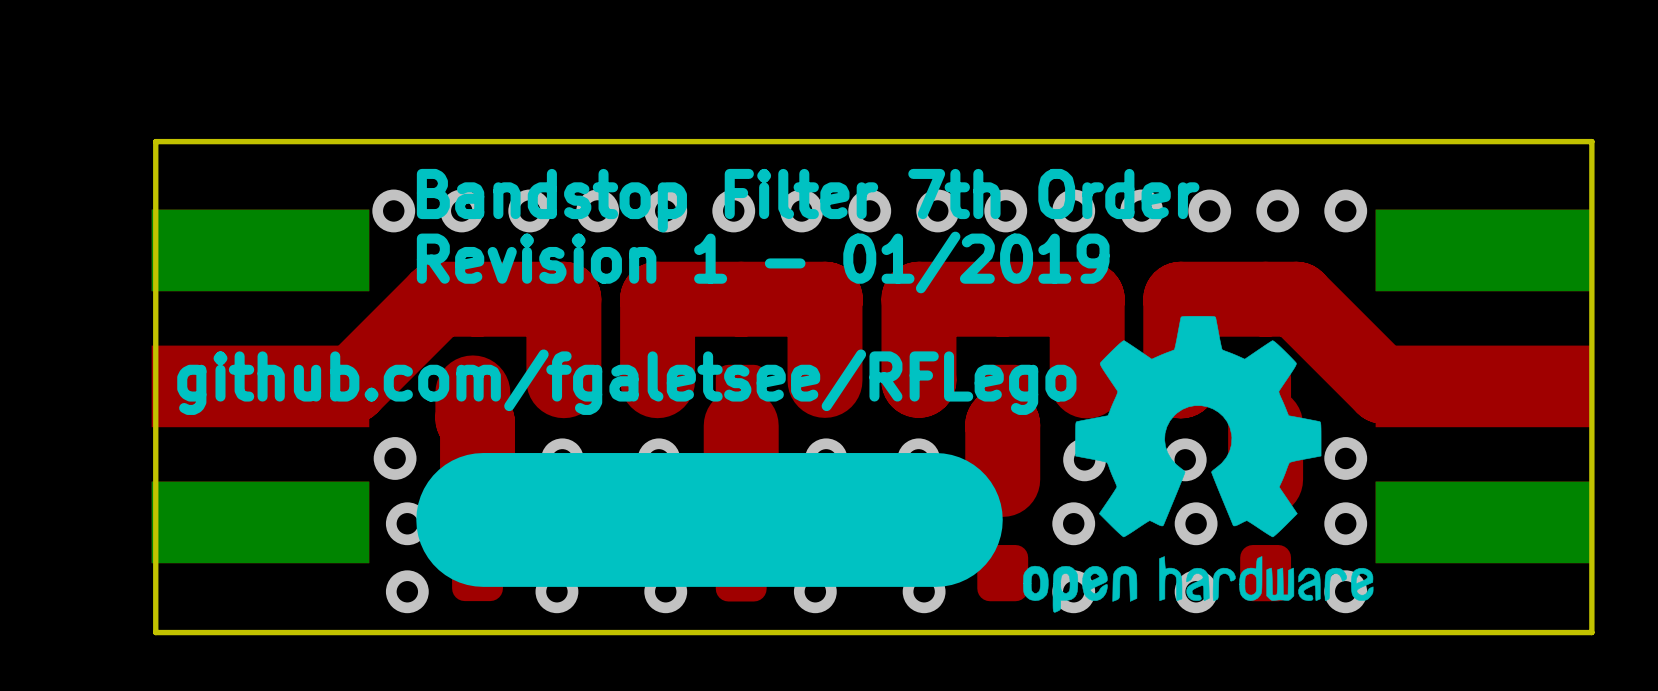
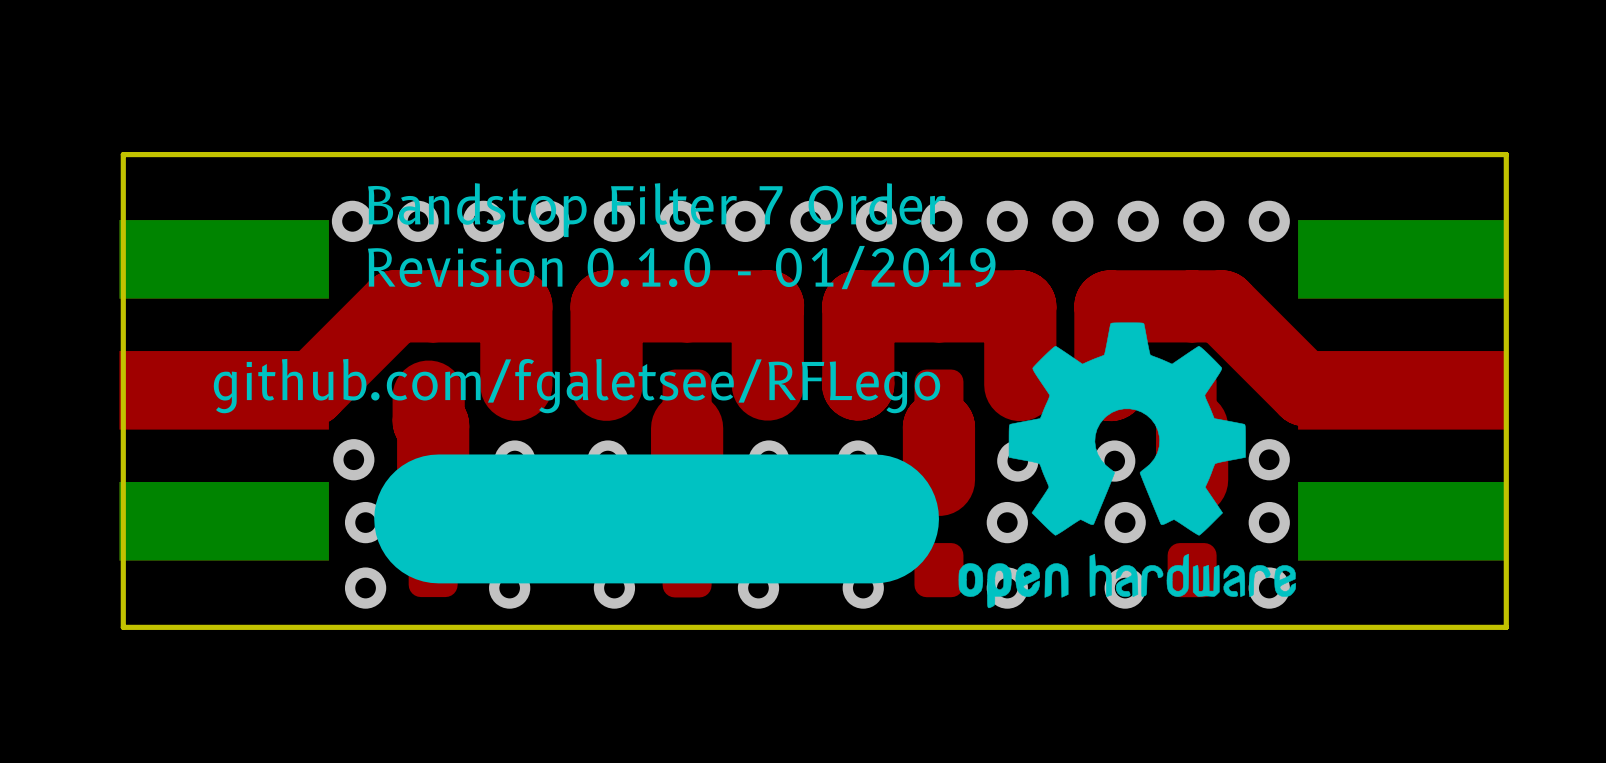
text: Bandstop Filter 7th Order (808, 200) -> Bandstop Filter 7 Order (656, 210)
text: Revision 1 - 01/2019 (763, 262) -> Revision 0.1.0 - 01/2019 (681, 267)

